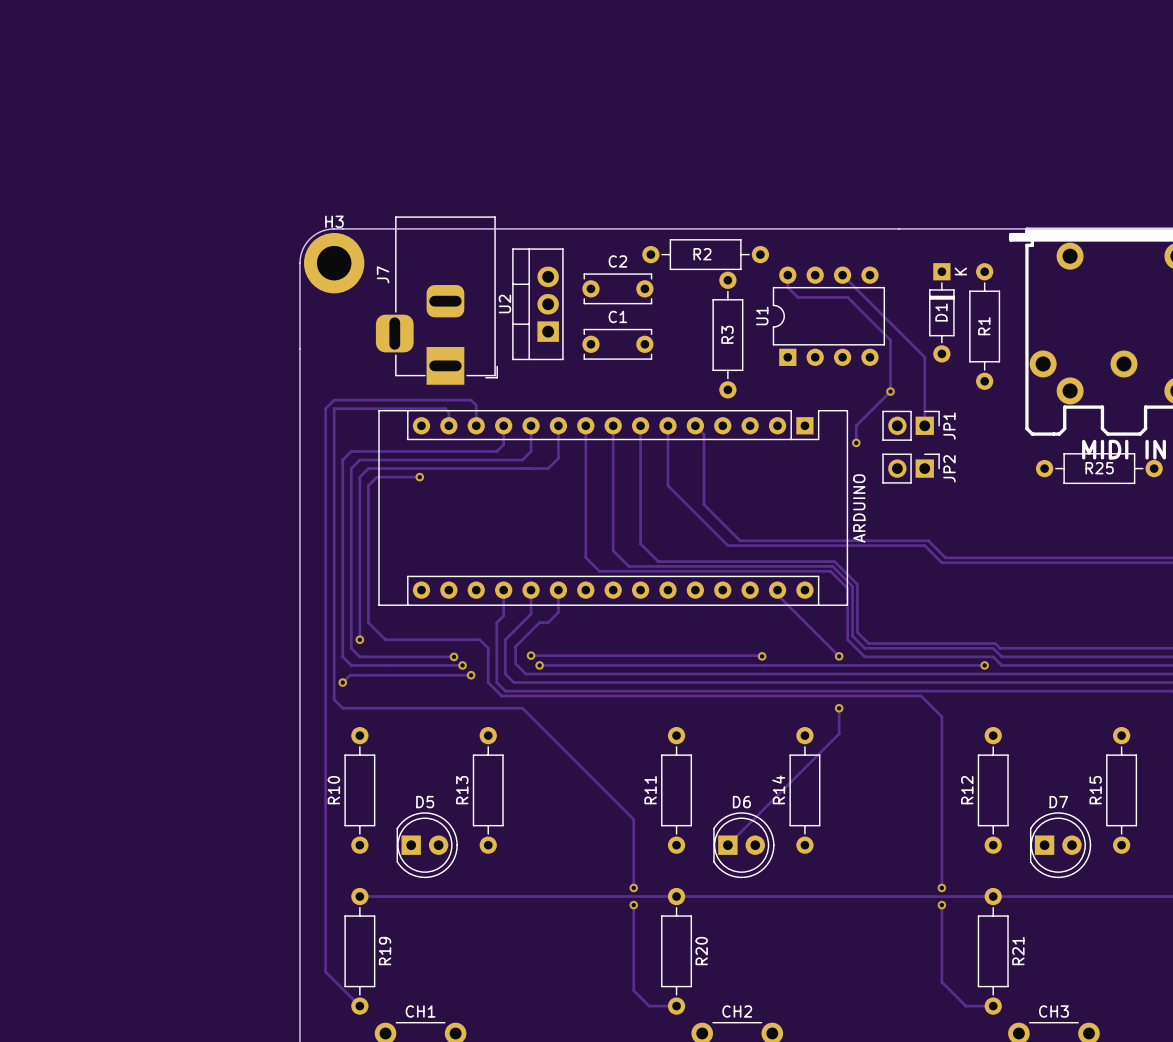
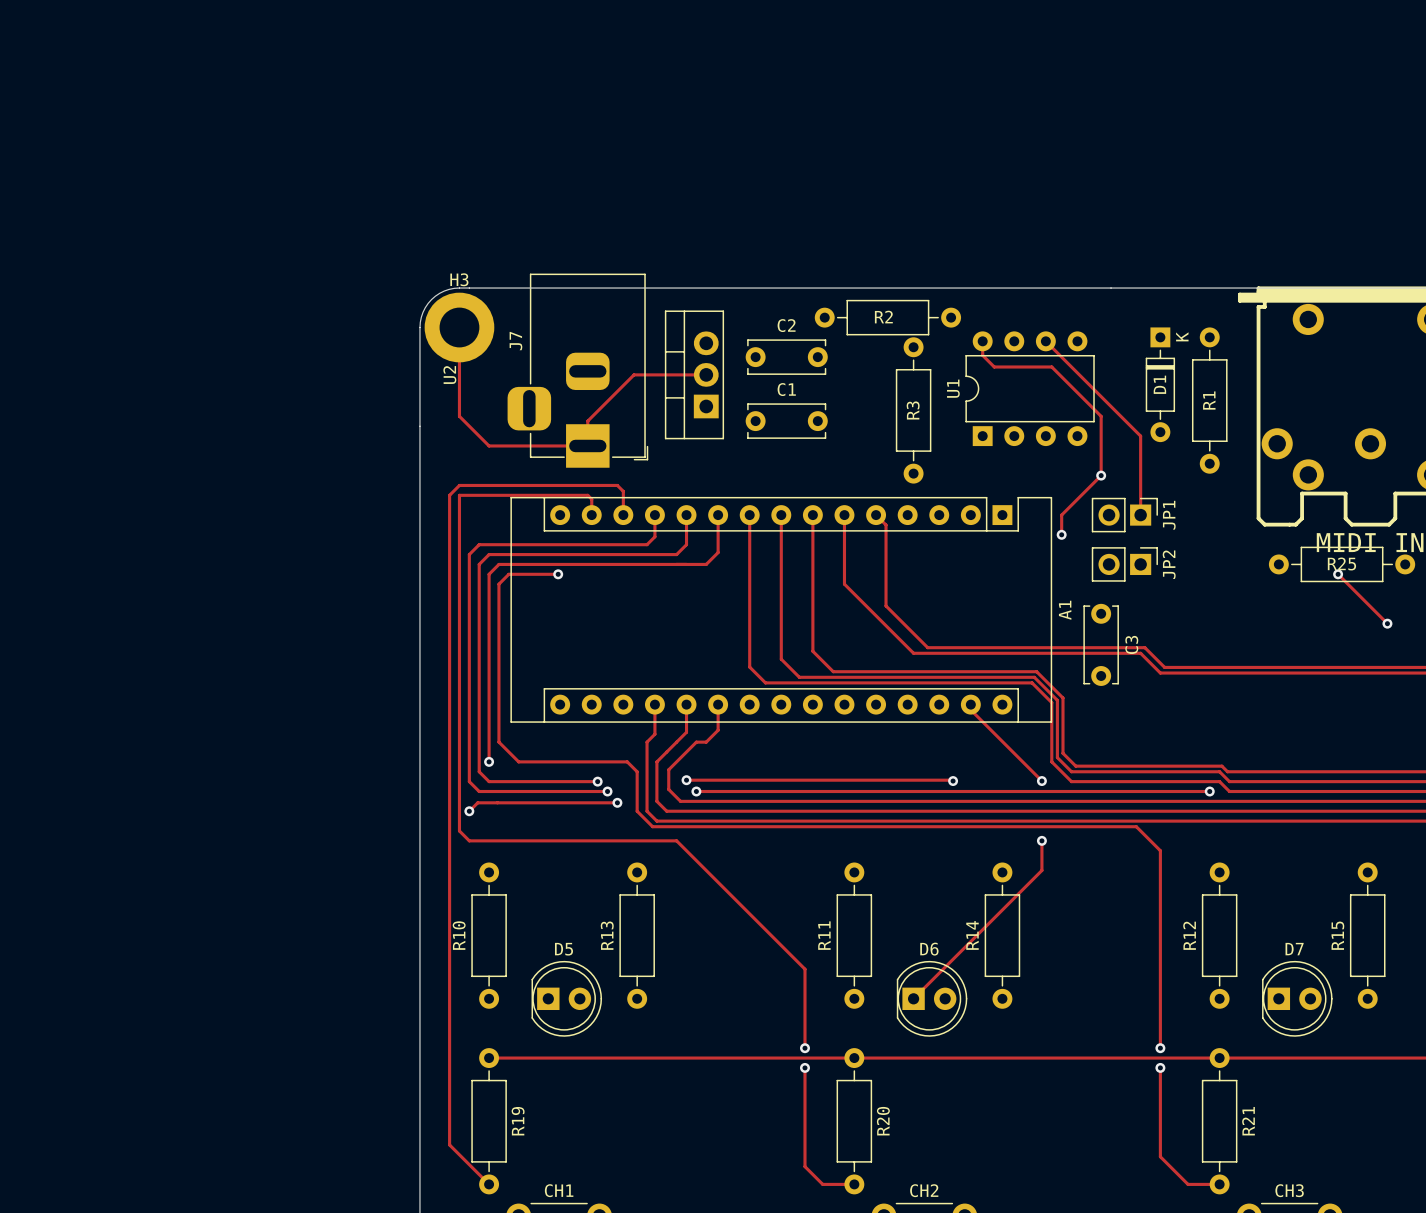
track: none -> (459, 327) (459, 416) (489, 445) (587, 445) (587, 421) (634, 374) (706, 374)
U2 name position: U2 (504, 303) -> U2 (449, 375)
track: none -> (1338, 574) (1387, 623)
via: none -> (1338, 574)
ARDUINO name: ARDUINO (859, 508) -> A1 (1065, 610)
via: none -> (1387, 623)
C3: none -> (1101, 644)

